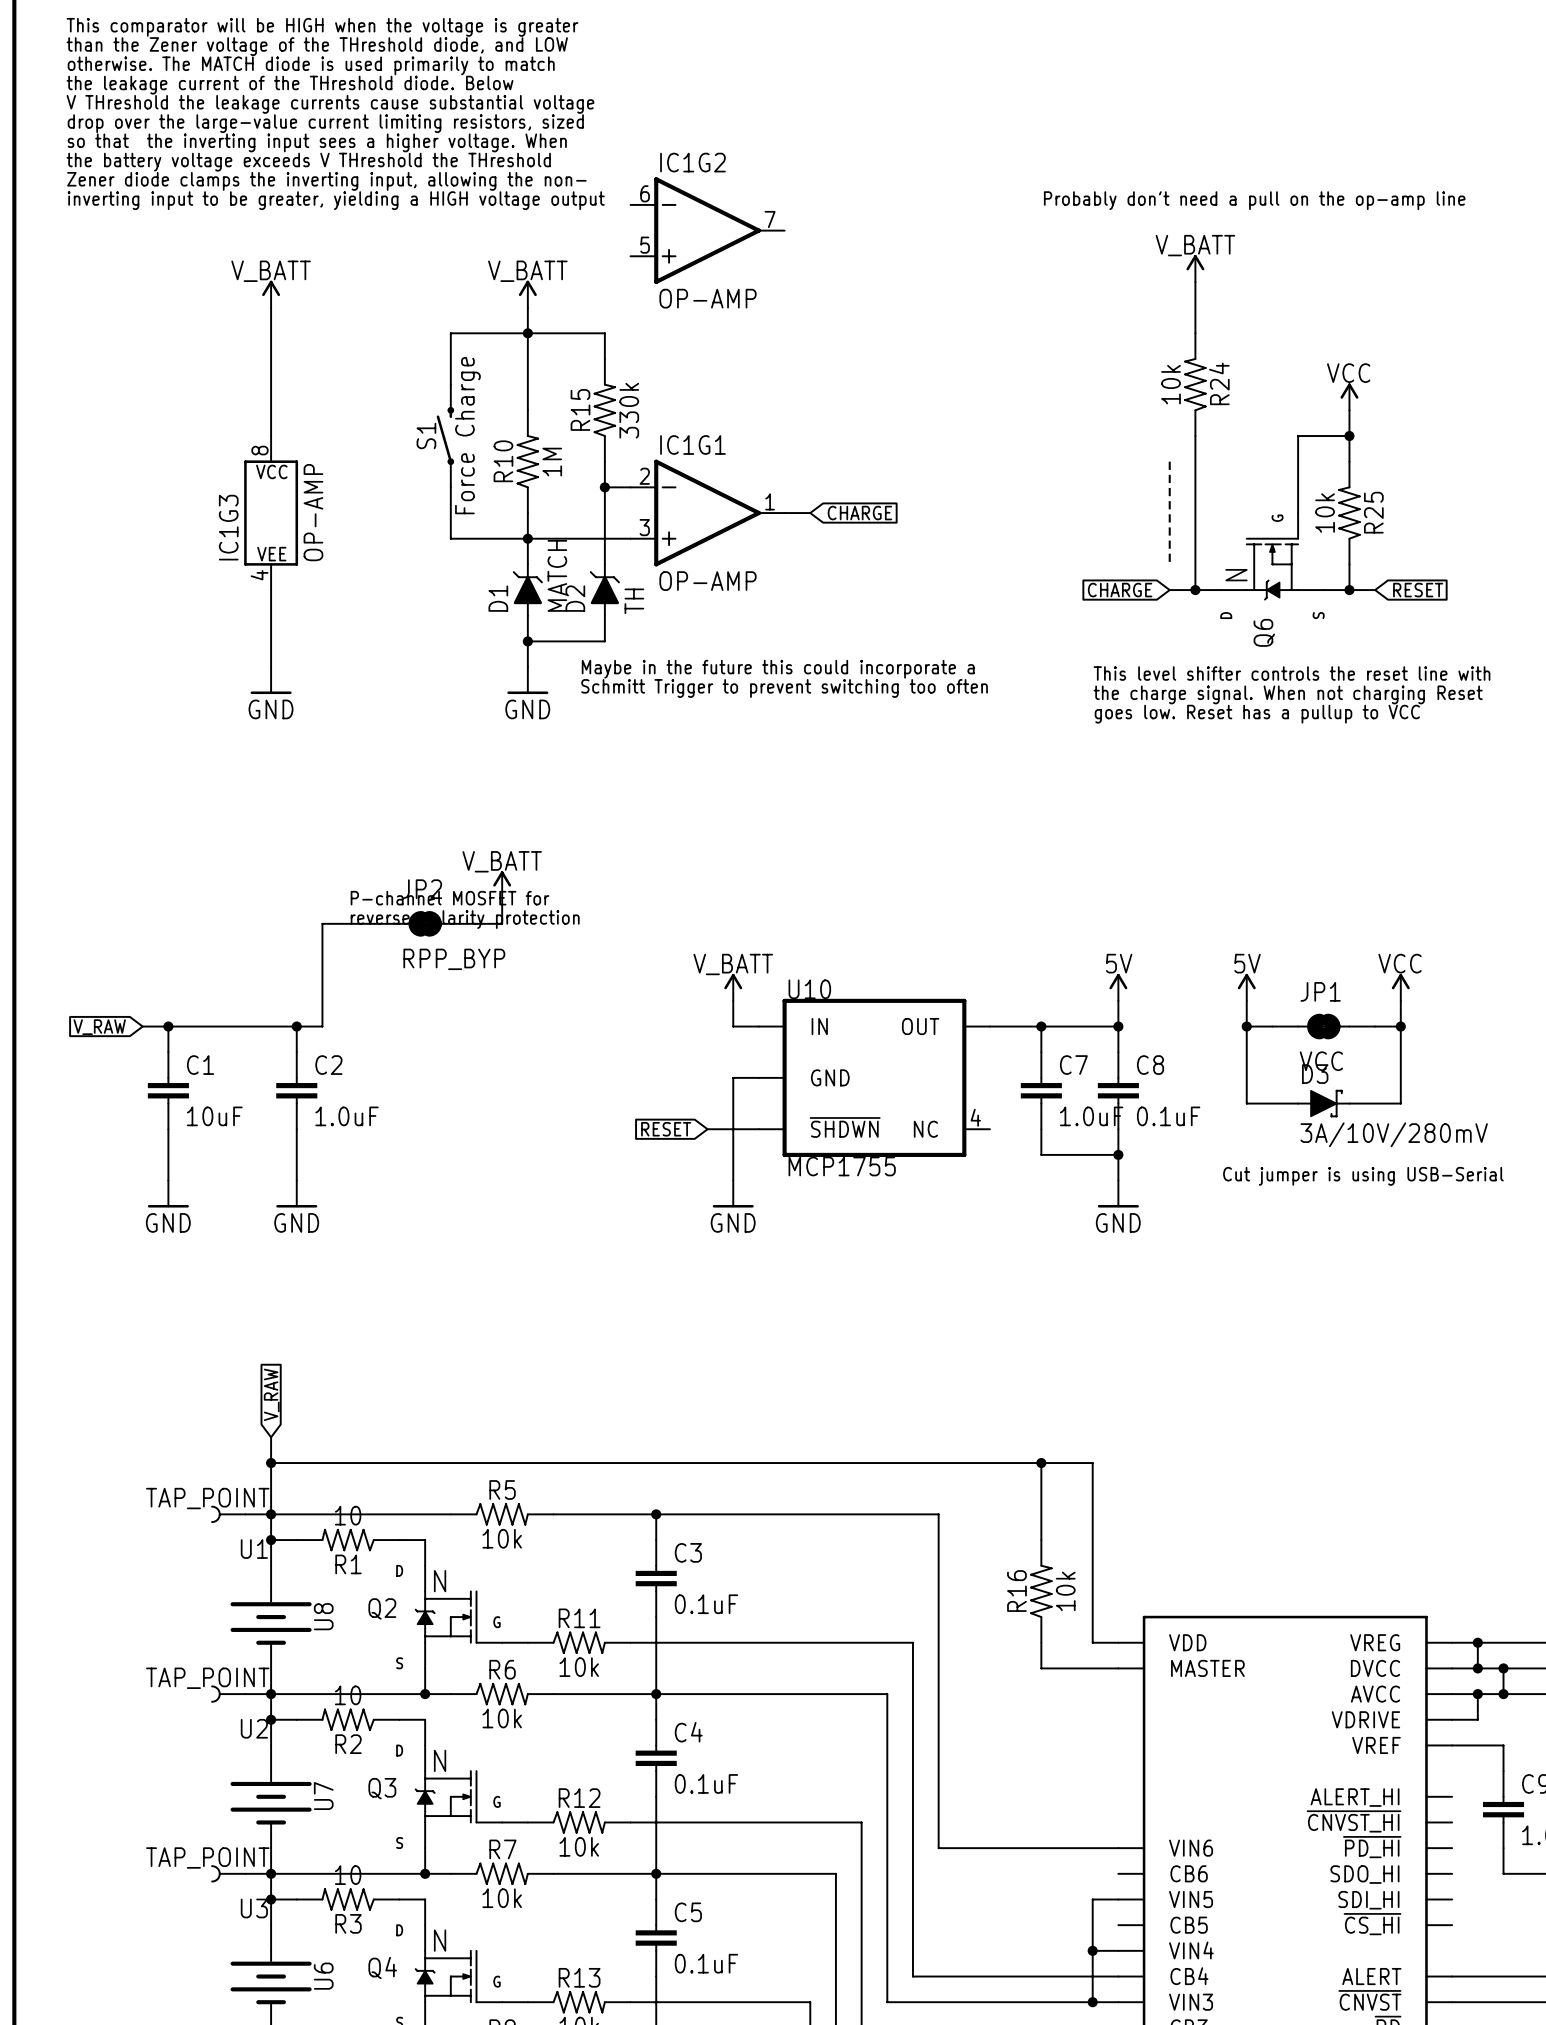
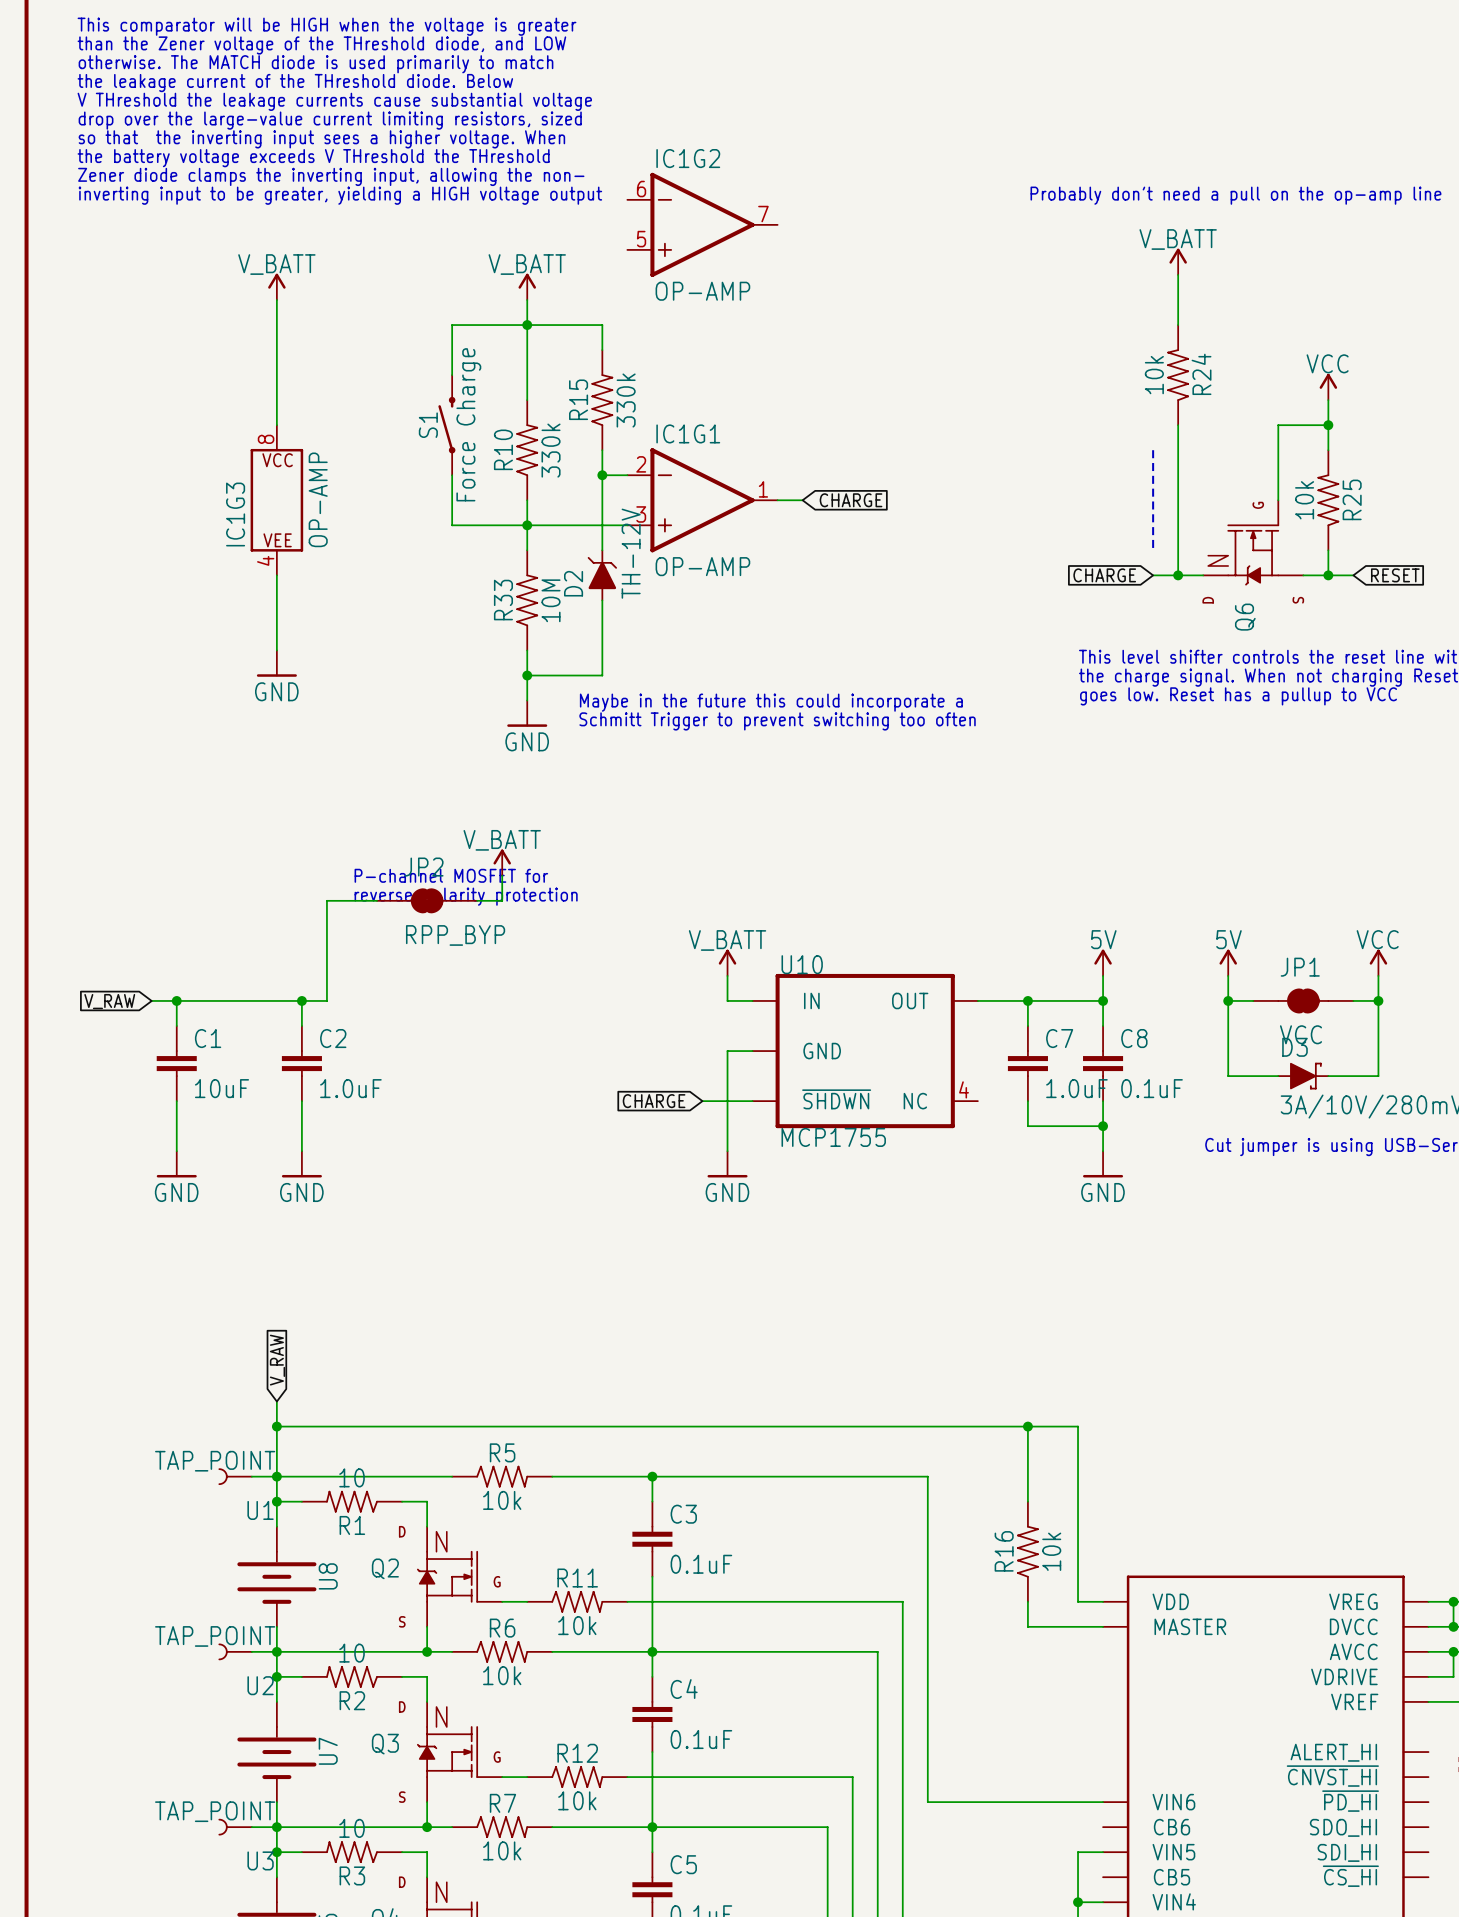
R10 value: 1M (552, 462) -> 330k (551, 450)
D1: MATCH (527, 590) -> none
D2 value: TH (634, 601) -> TH-12V (631, 553)
R33: none -> 10M (527, 600)
wire: (527, 641) (604, 641) -> (527, 675) (602, 675) (602, 625)
junction position: (527, 641) -> (527, 675)
text position: Maybe in the future this could incorporate a (778, 669) -> Maybe in the future this could incorporate a (771, 702)
power symbol position: GND (527, 680) -> GND (527, 713)
text position: Schmitt Trigger to prevent switching too often (784, 688) -> Schmitt Trigger to prevent switching too often (777, 721)
global label: RESET (666, 1129) -> CHARGE (654, 1101)

